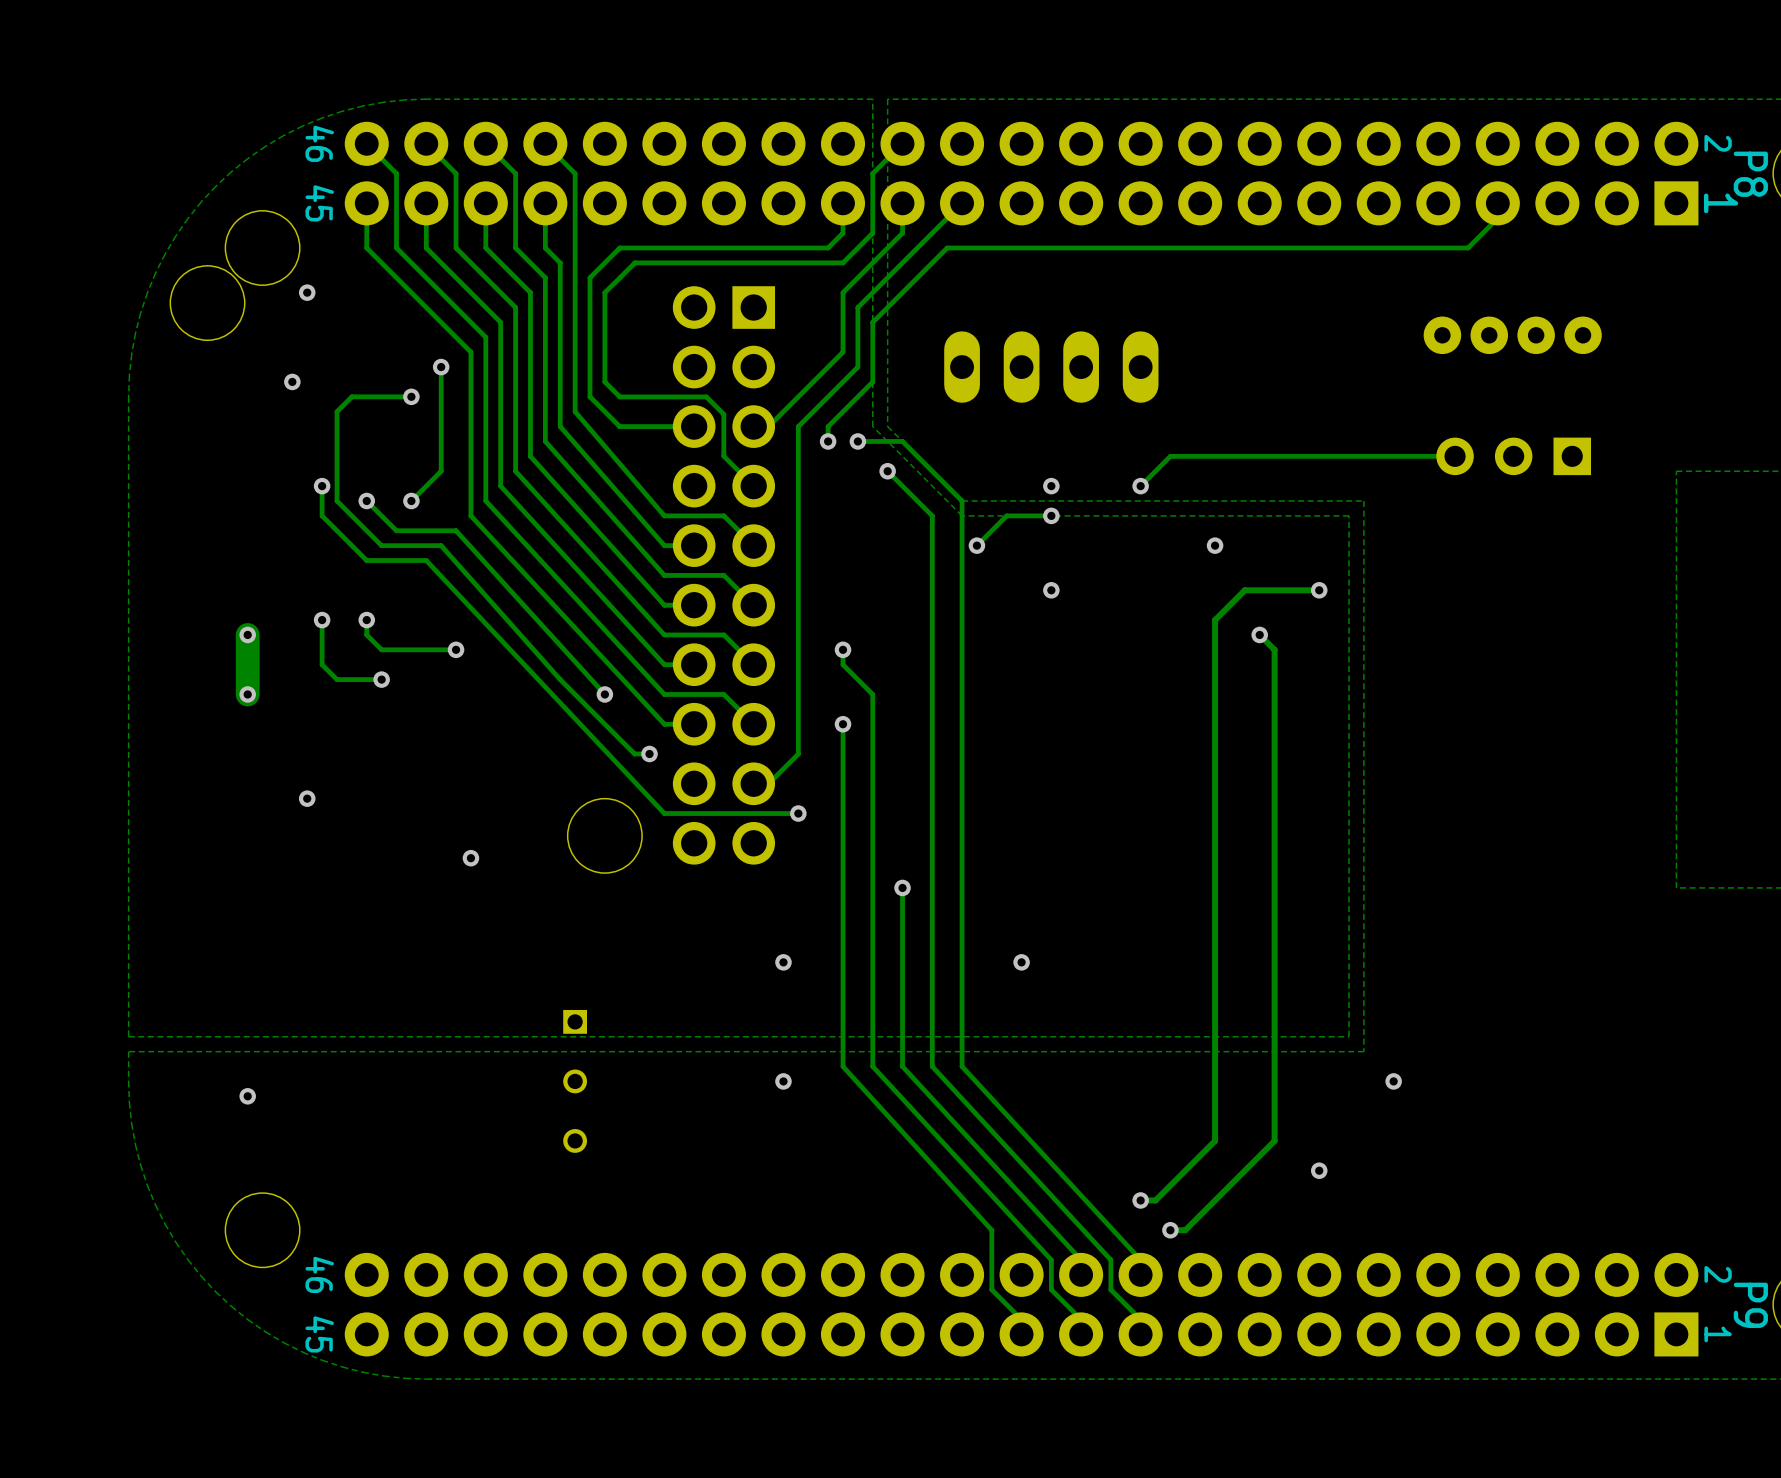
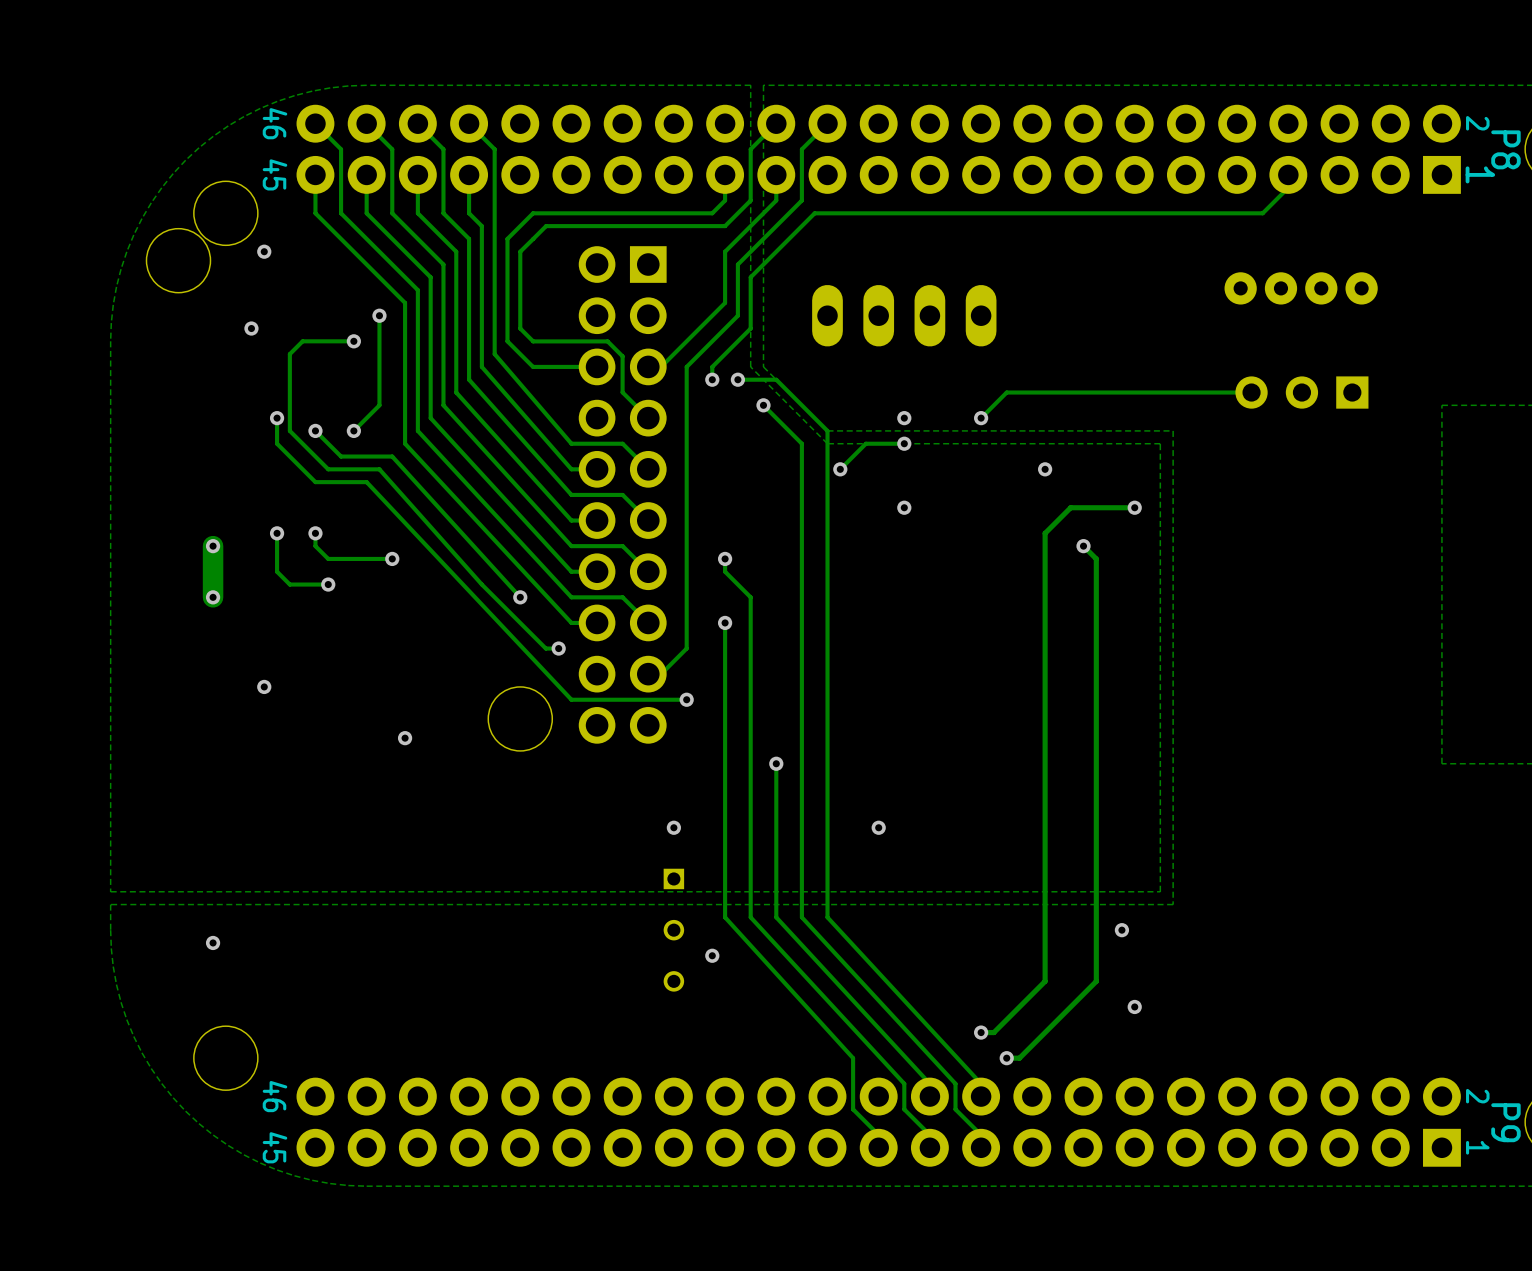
track: (962, 203) (932, 233) -> (827, 123) (801, 149) (801, 200)
part position: (575, 1081) -> (673, 930)
via position: (783, 1081) -> (712, 955)
via position: (1393, 1081) -> (1121, 930)

